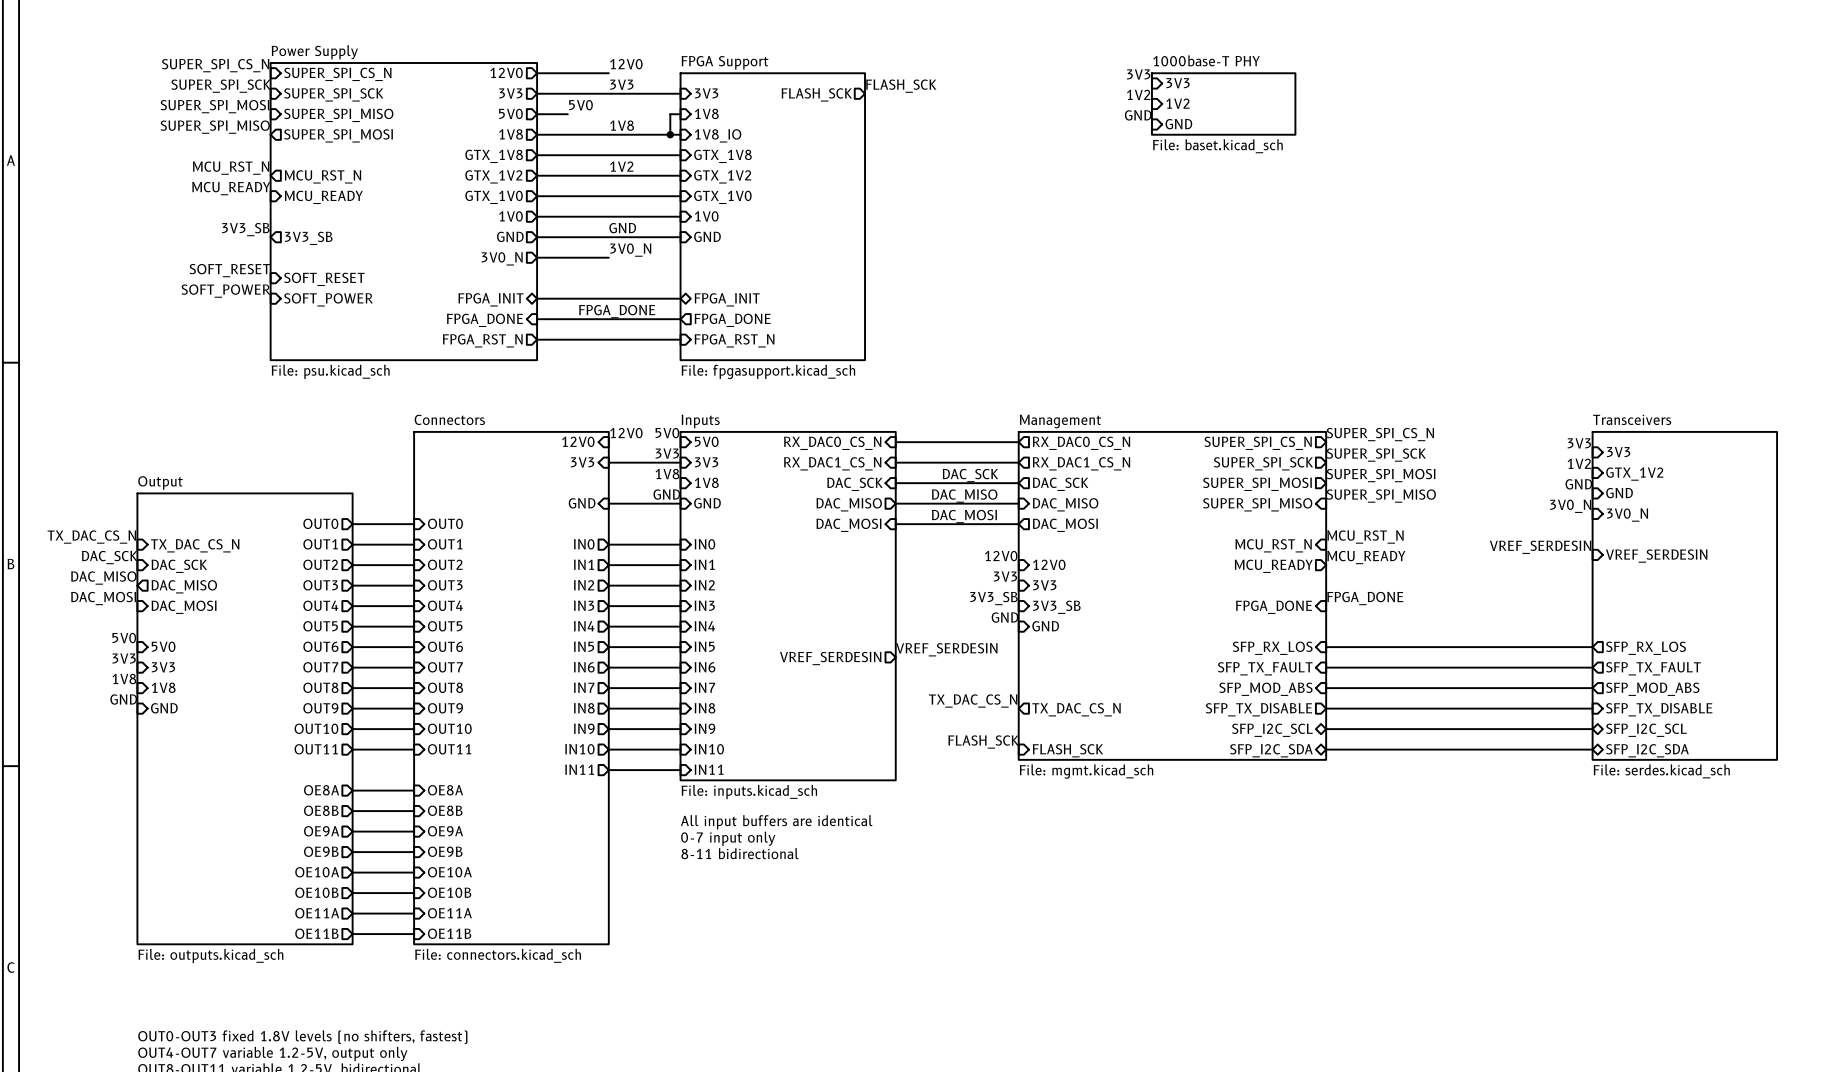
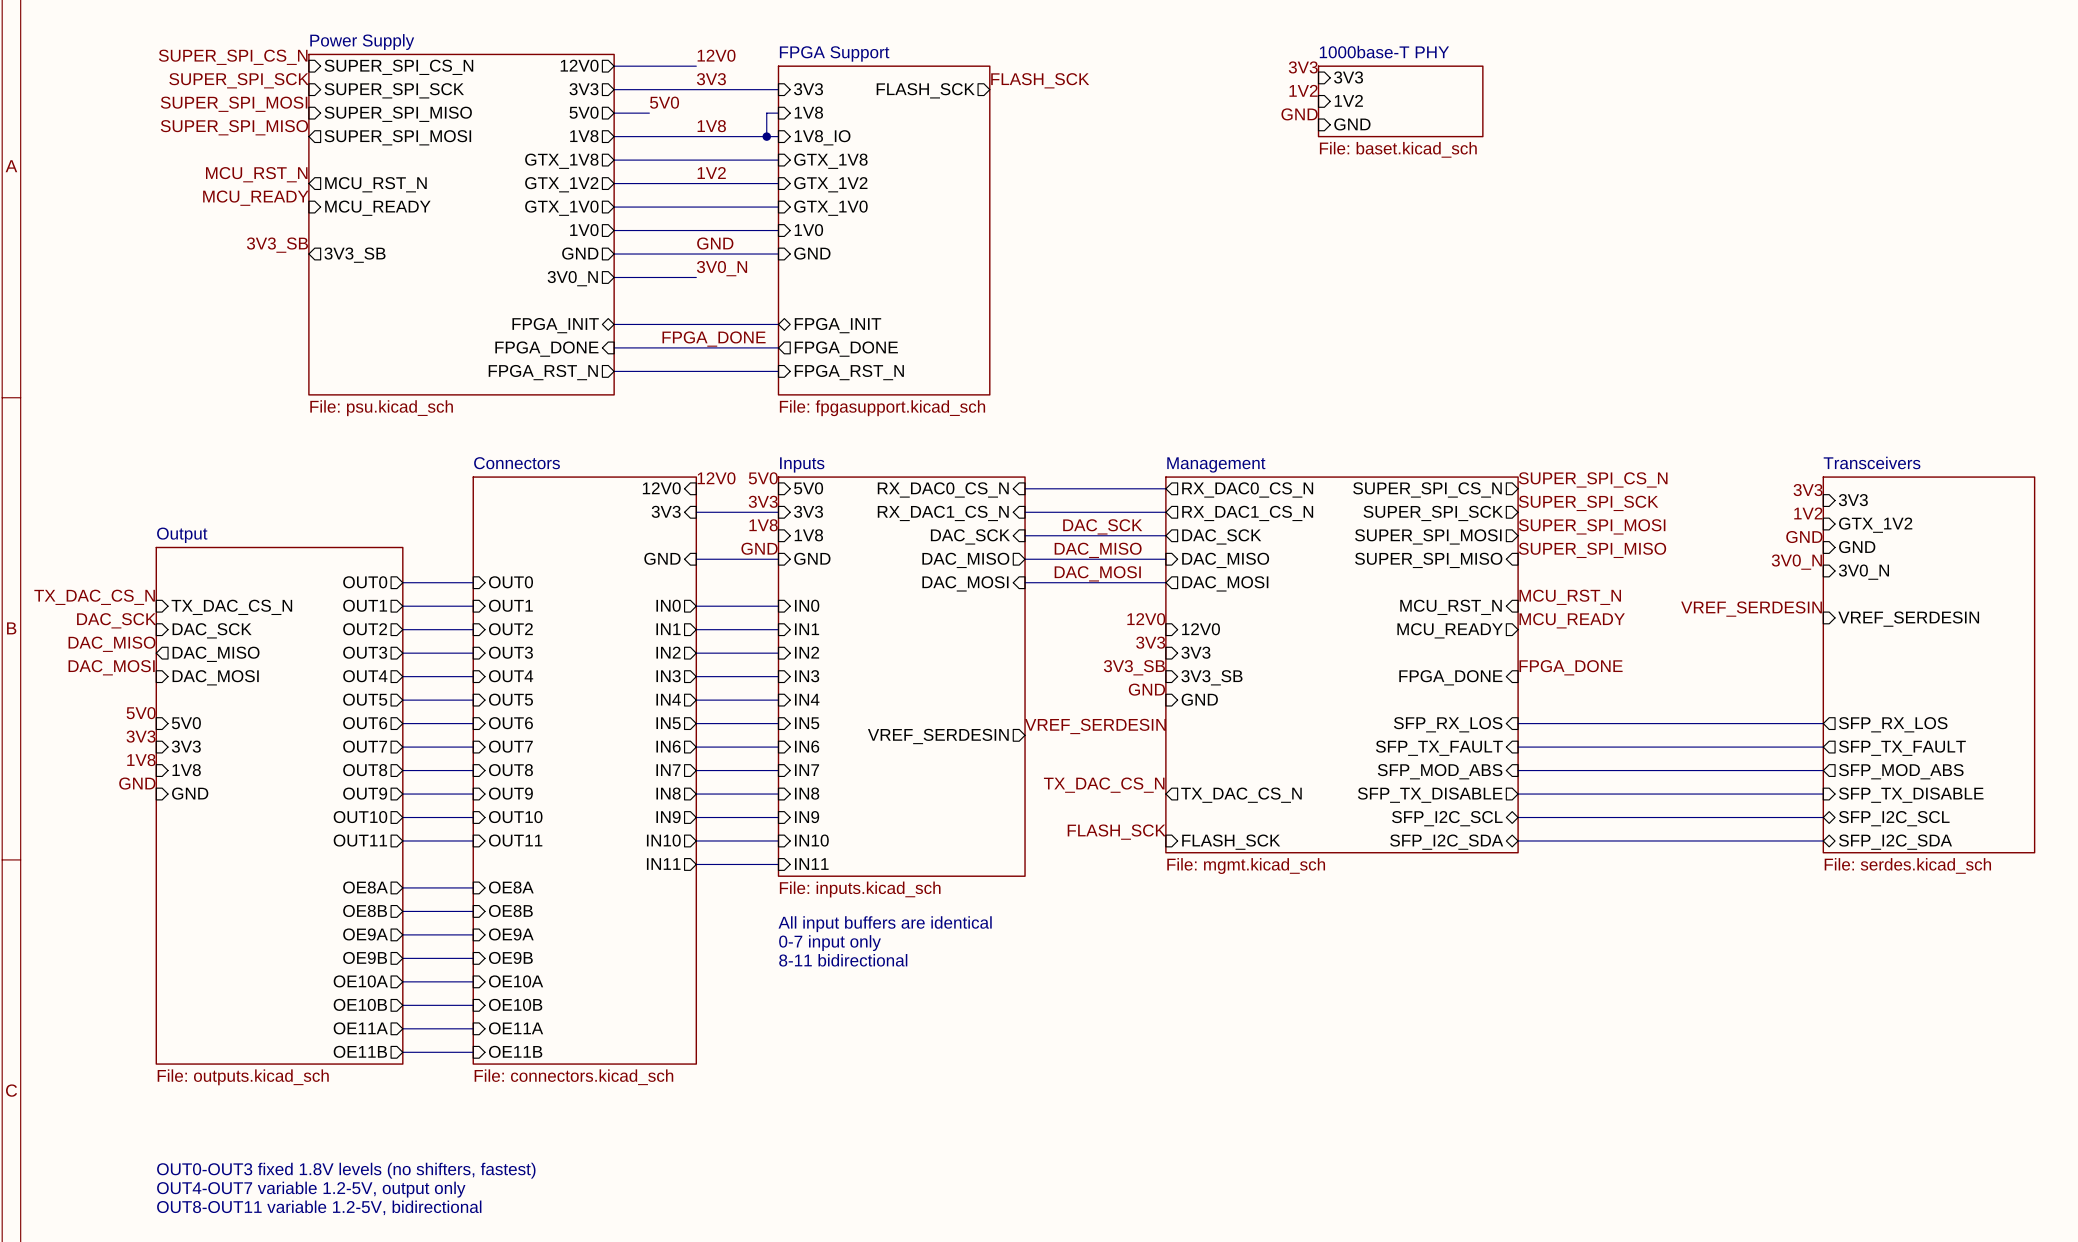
label: SOFT_RESET (229, 270) -> none
sheet pin: SOFT_RESET (324, 279) -> none
label: SOFT_POWER (225, 291) -> none
sheet pin: SOFT_POWER (328, 299) -> none

